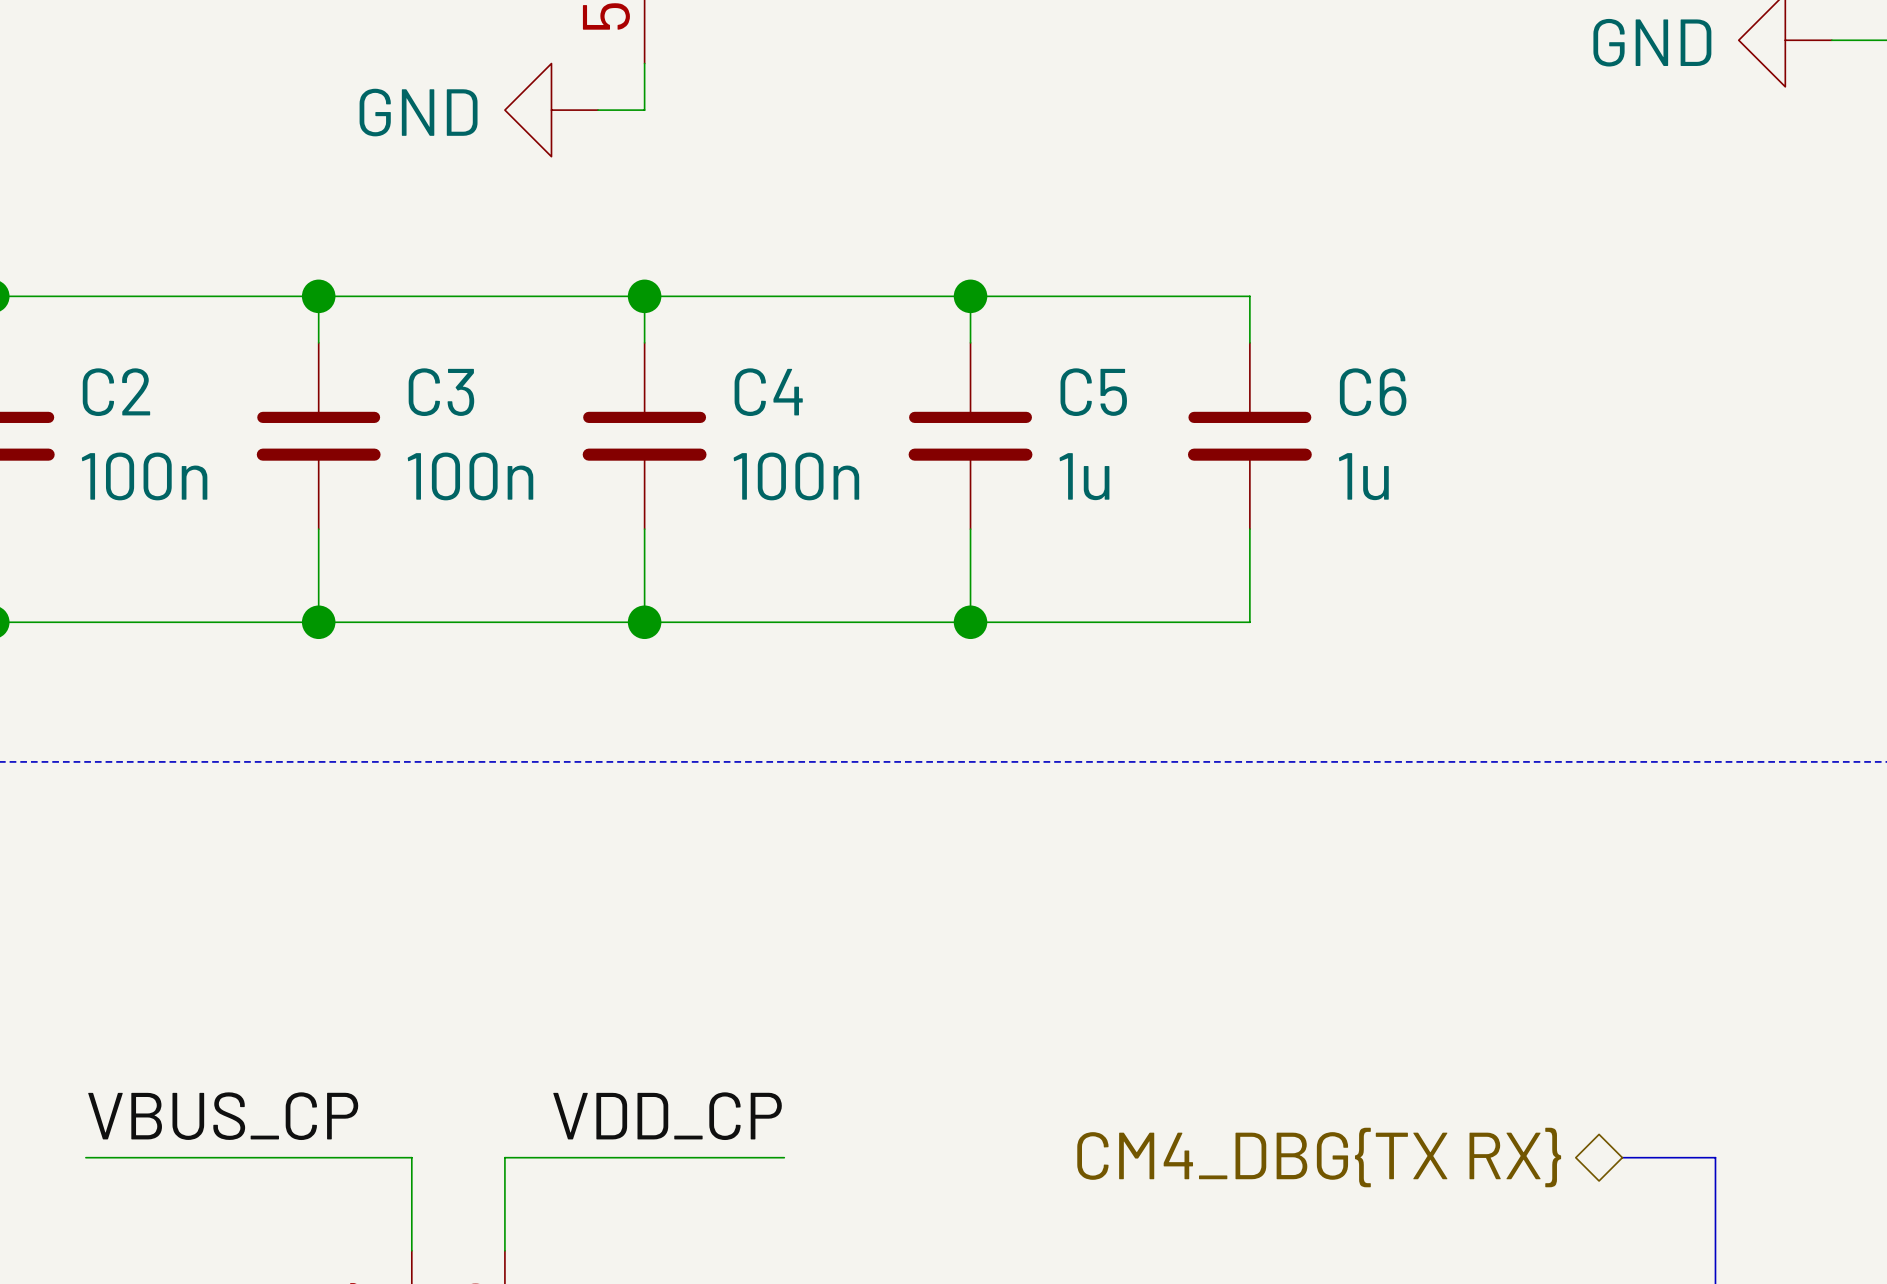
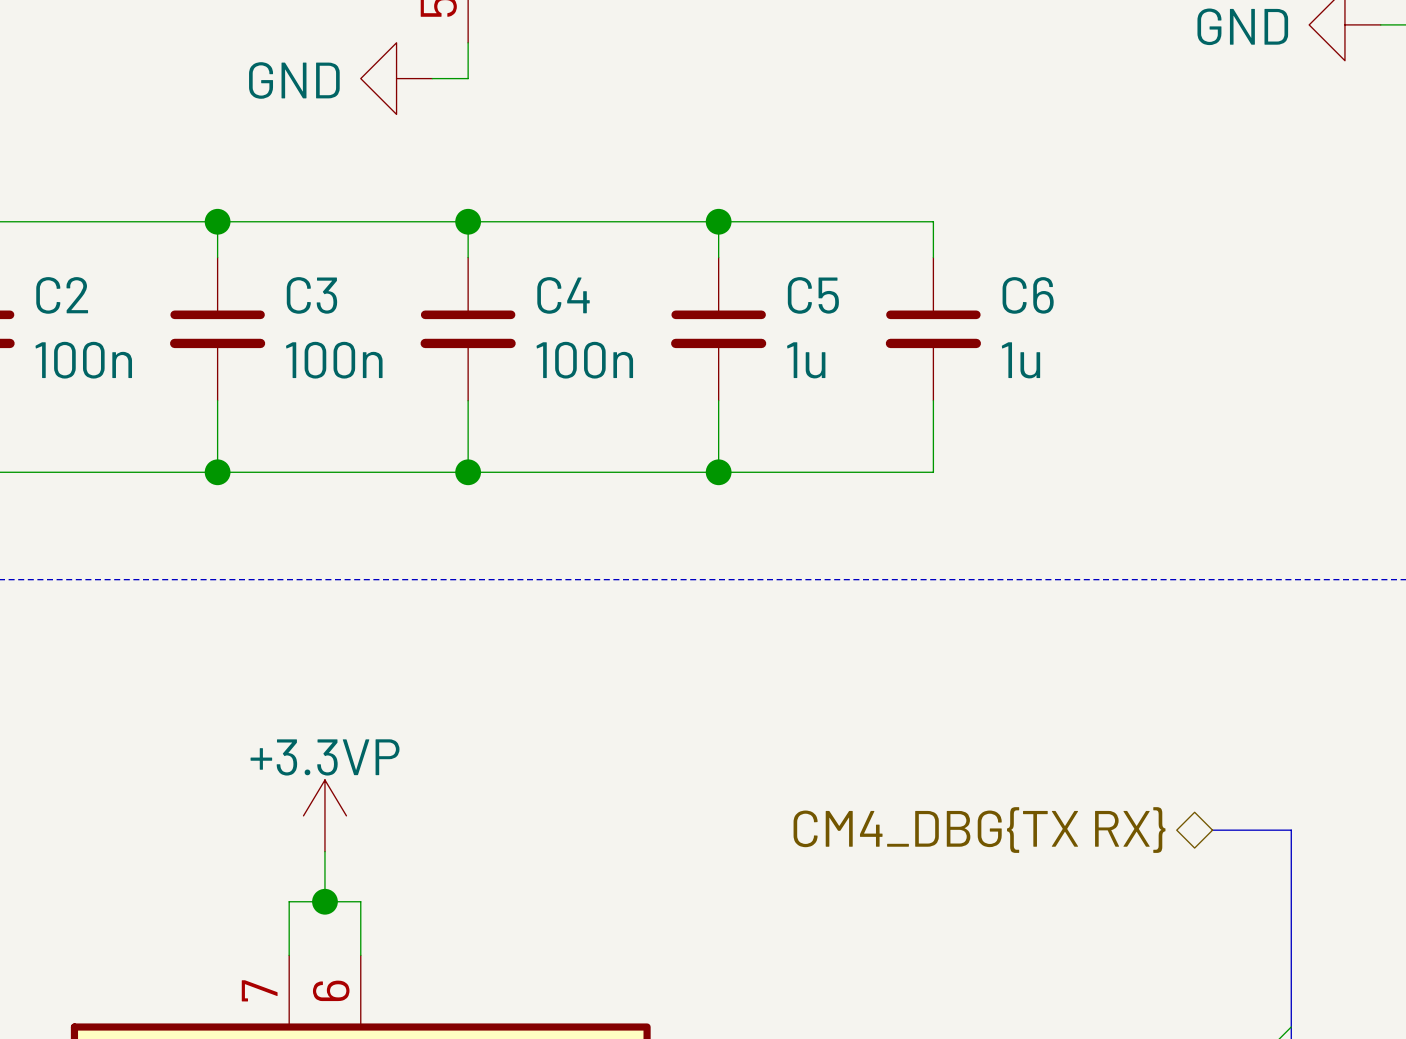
power symbol: none -> +3.3VP (324, 815)
wire: none -> (324, 851) (324, 901)
label: VBUS_CP (223, 1116) -> none
label: VDD_CP (667, 1116) -> none
wire: (85, 1157) (411, 1157) (411, 1180) -> none
wire: (784, 1157) (504, 1157) (504, 1180) -> (289, 901) (360, 901)
hierarchical label position: CM4_DBG{TX RX} (1319, 1157) -> CM4_DBG{TX RX} (979, 830)
bus: (1622, 1157) (1715, 1157) -> (1212, 830) (1291, 830) (1291, 883)
junction: none -> (324, 901)

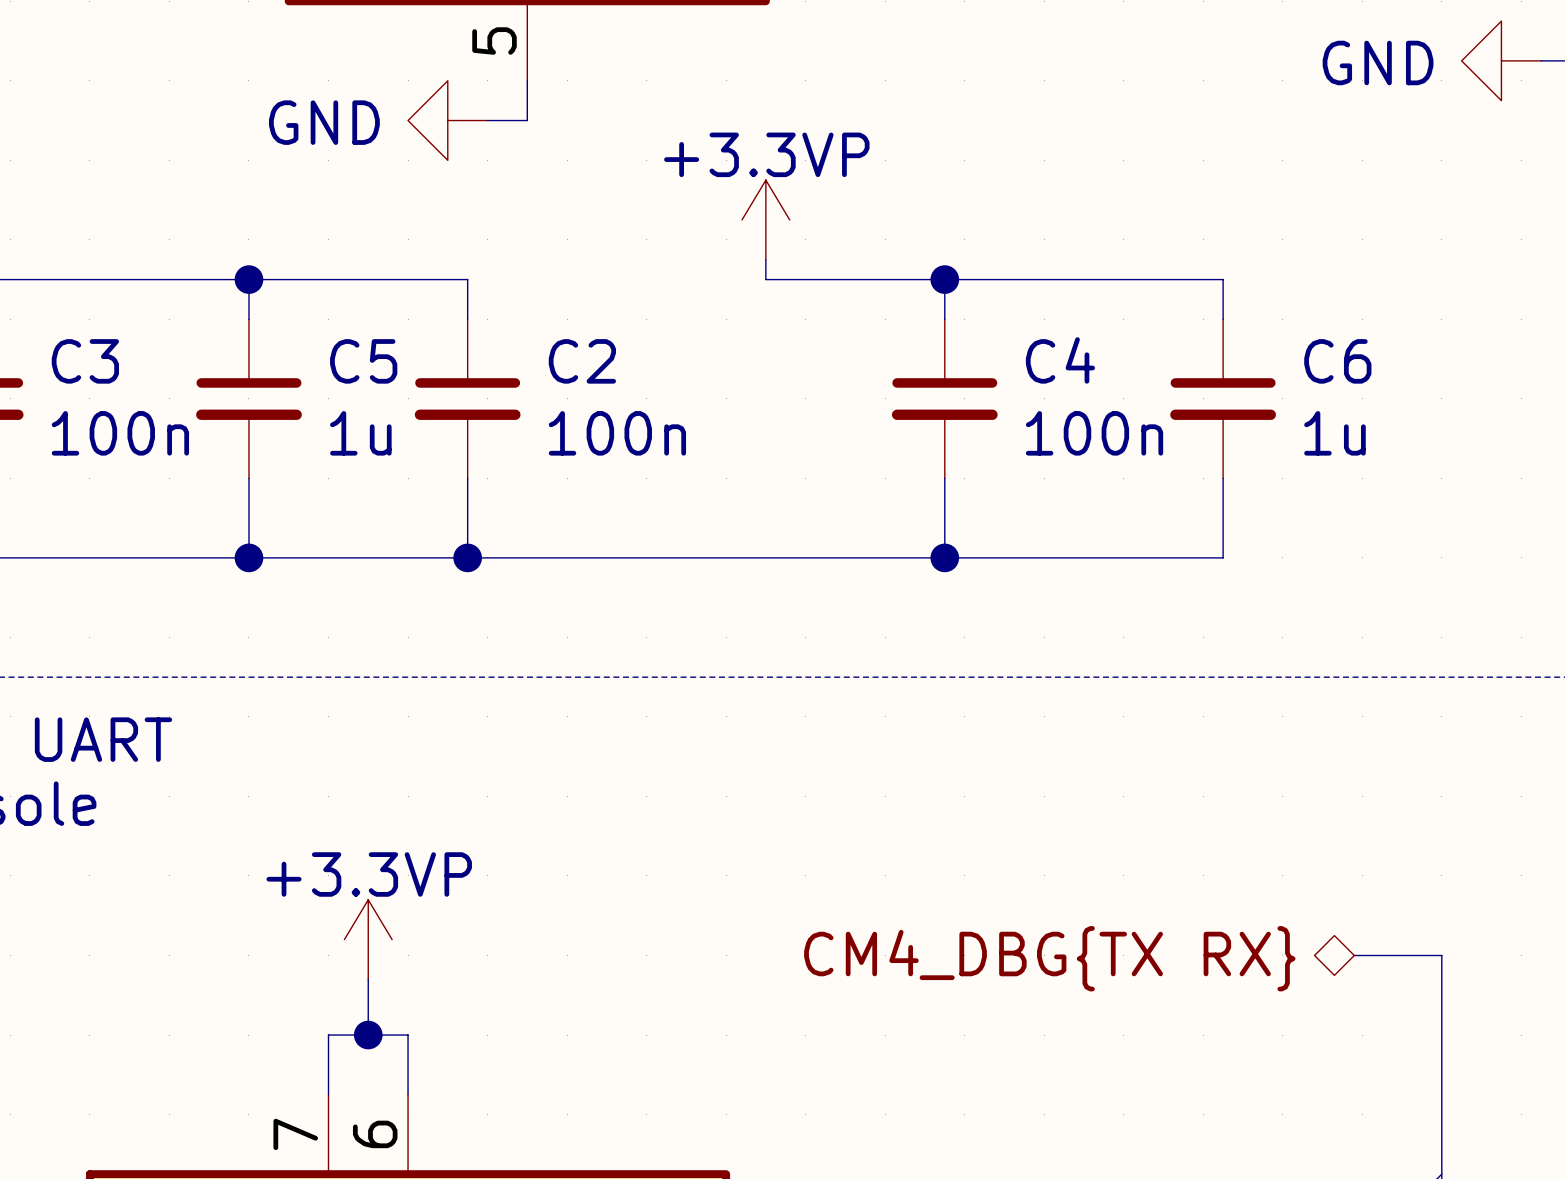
power symbol: none -> +3.3VP (765, 219)
wire: (414, 221) (682, 221) -> (765, 259) (765, 279)
wire: (468, 221) (468, 257) -> (467, 279) (467, 319)
junction: (468, 221) -> none
wire: (718, 221) (718, 257) -> (944, 279) (944, 319)
junction position: (718, 221) -> (944, 279)
wire: (933, 221) (933, 257) -> (1044, 279) (1223, 279) (1223, 319)
C2 name: C2 (62, 295) -> C3 (85, 361)
C3 name: C3 (311, 295) -> C5 (363, 361)
C2: none -> 100n (467, 398)
C4 position: (468, 329) -> (944, 398)
C5: 1u (718, 329) -> none
C6 position: (933, 329) -> (1223, 398)
C3 value: 100n (334, 360) -> 1u (360, 433)
wire: (468, 400) (468, 472) -> (467, 478) (467, 557)
wire: (718, 400) (718, 472) -> (944, 478) (944, 557)
wire: (933, 400) (933, 472) -> (1223, 478) (1223, 557) (1044, 557)
junction position: (468, 472) -> (467, 557)
junction position: (718, 472) -> (944, 557)

